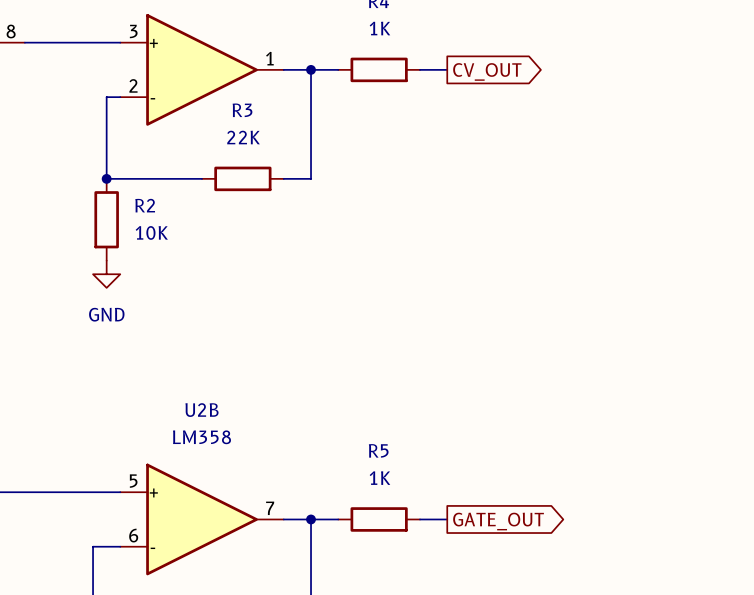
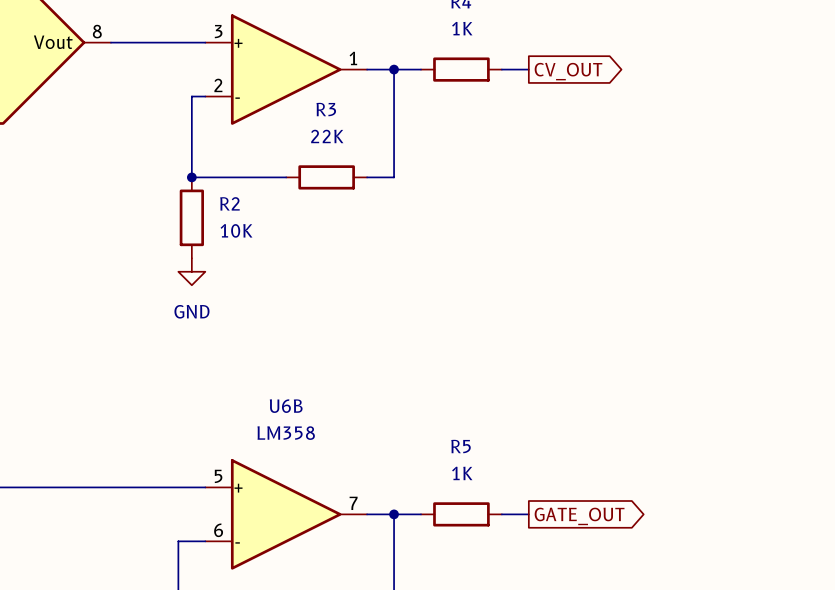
U2B name: U2B (201, 410) -> U6B (286, 406)

